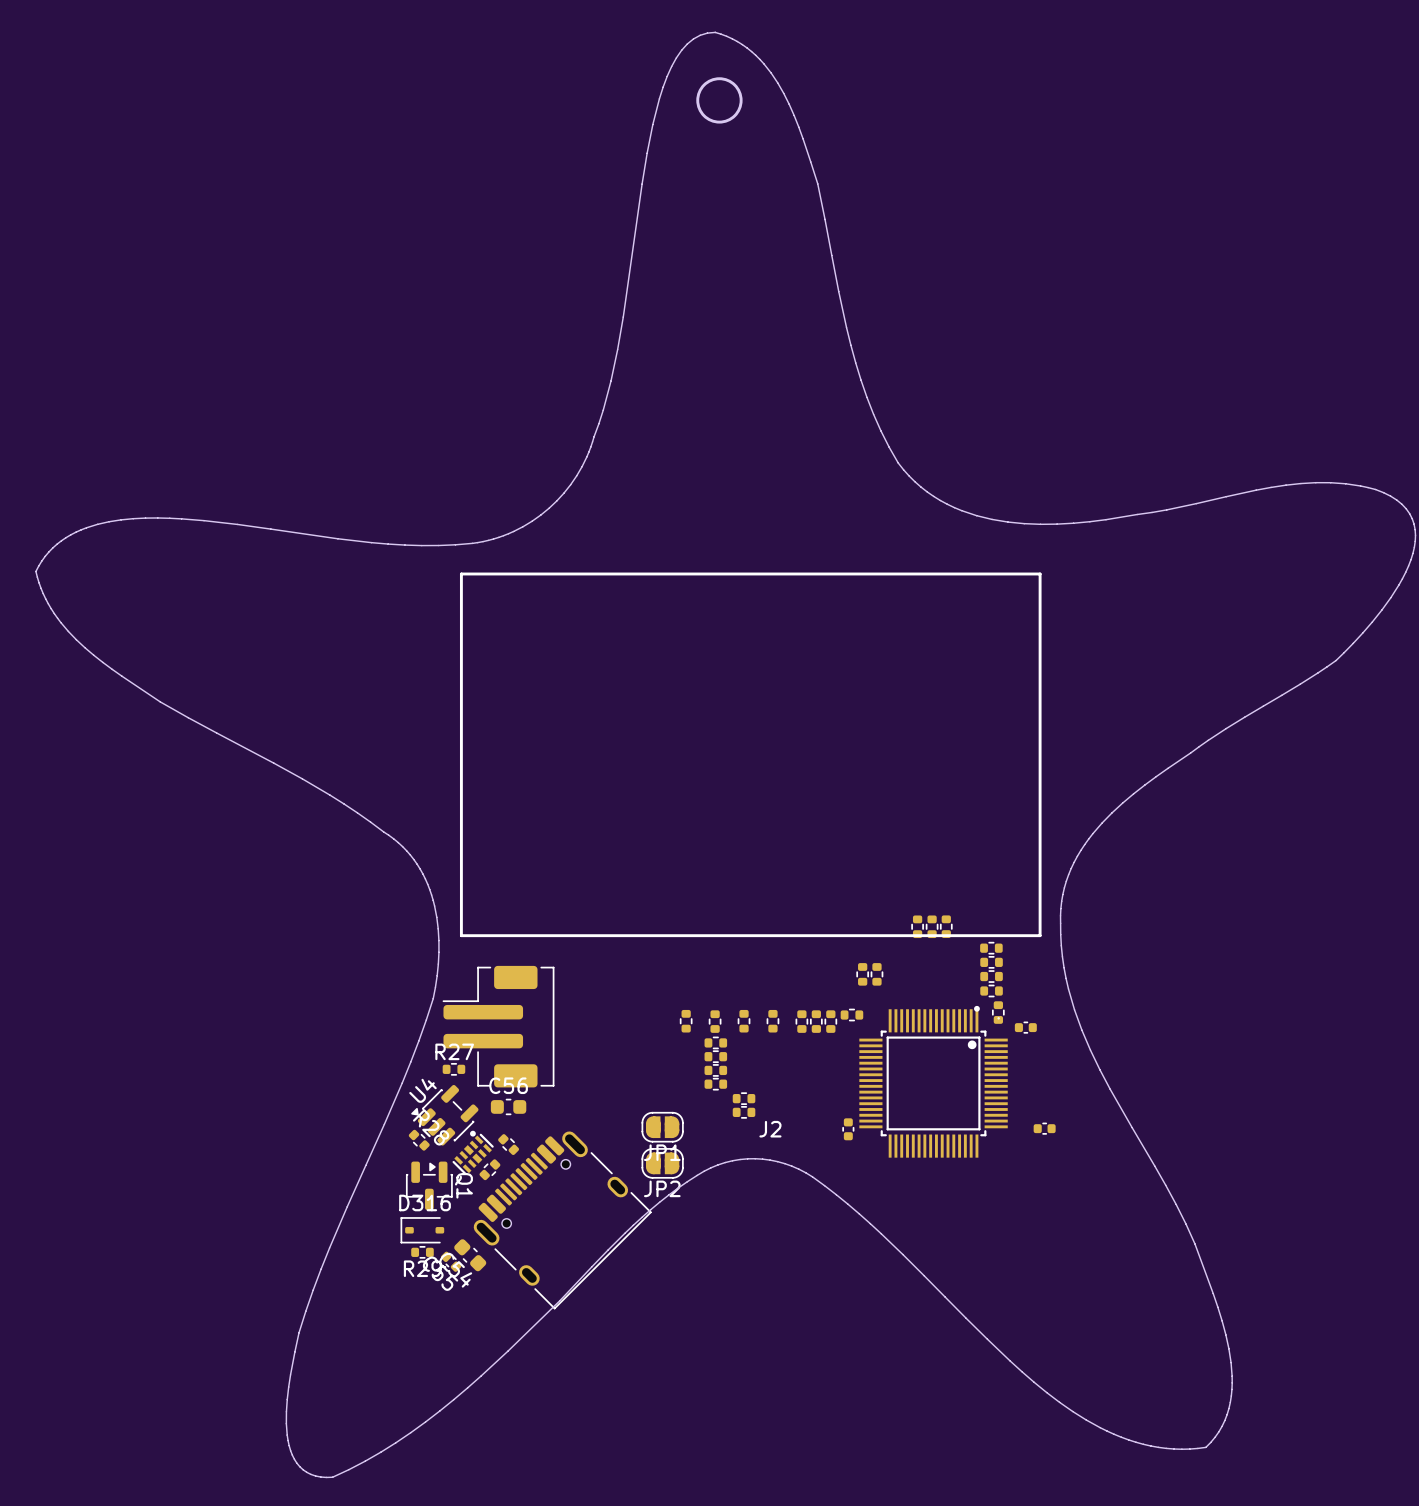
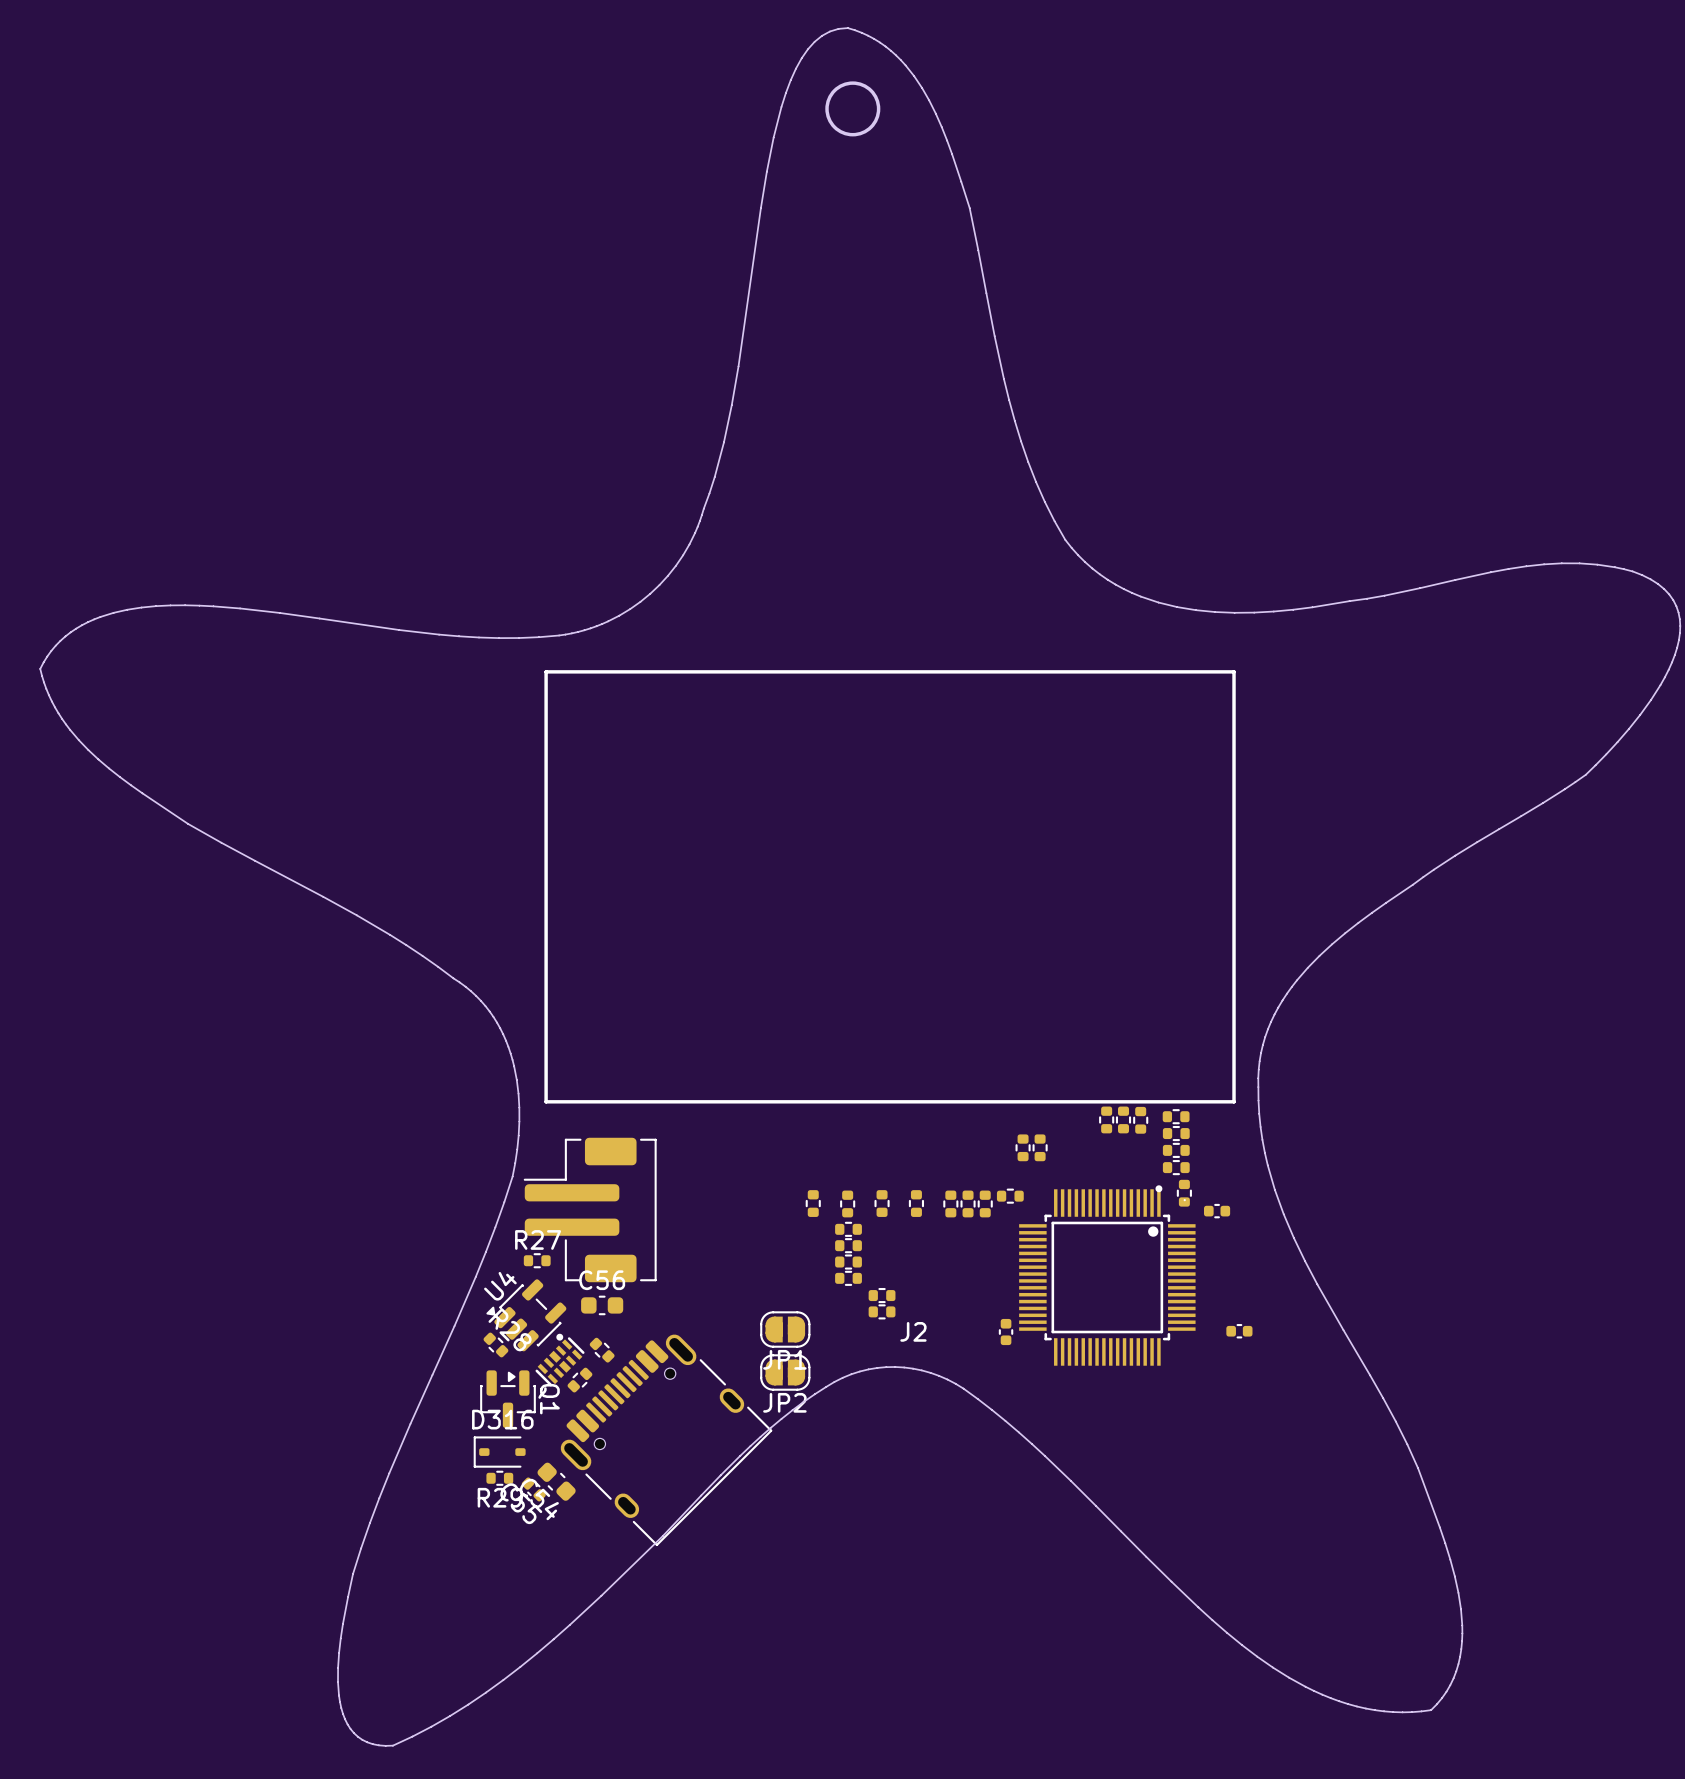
part: (917, 926) -> none
part: (932, 926) -> none
part: (946, 926) -> none
part: none -> (1106, 1119)
part: none -> (1123, 1119)
part: none -> (1140, 1120)

